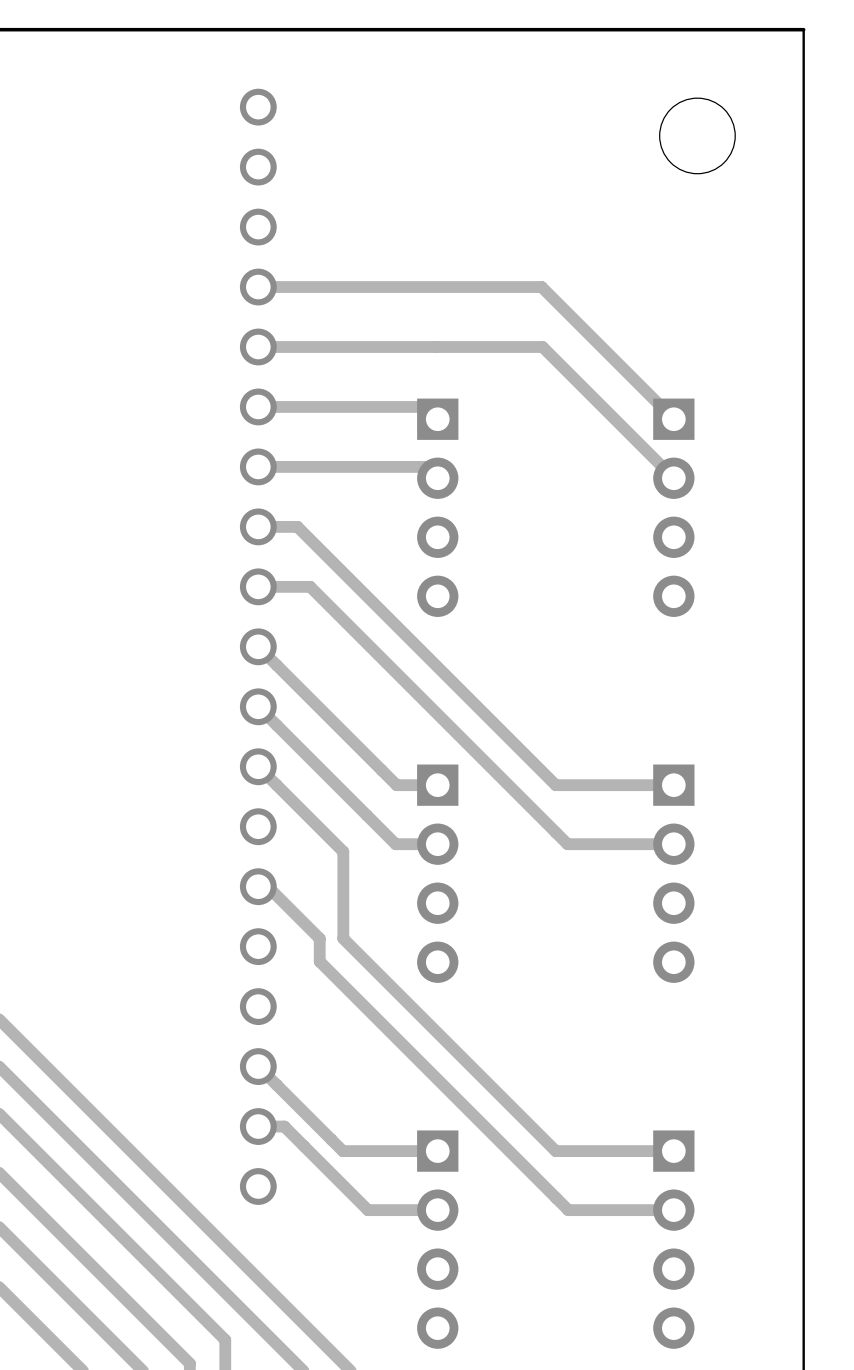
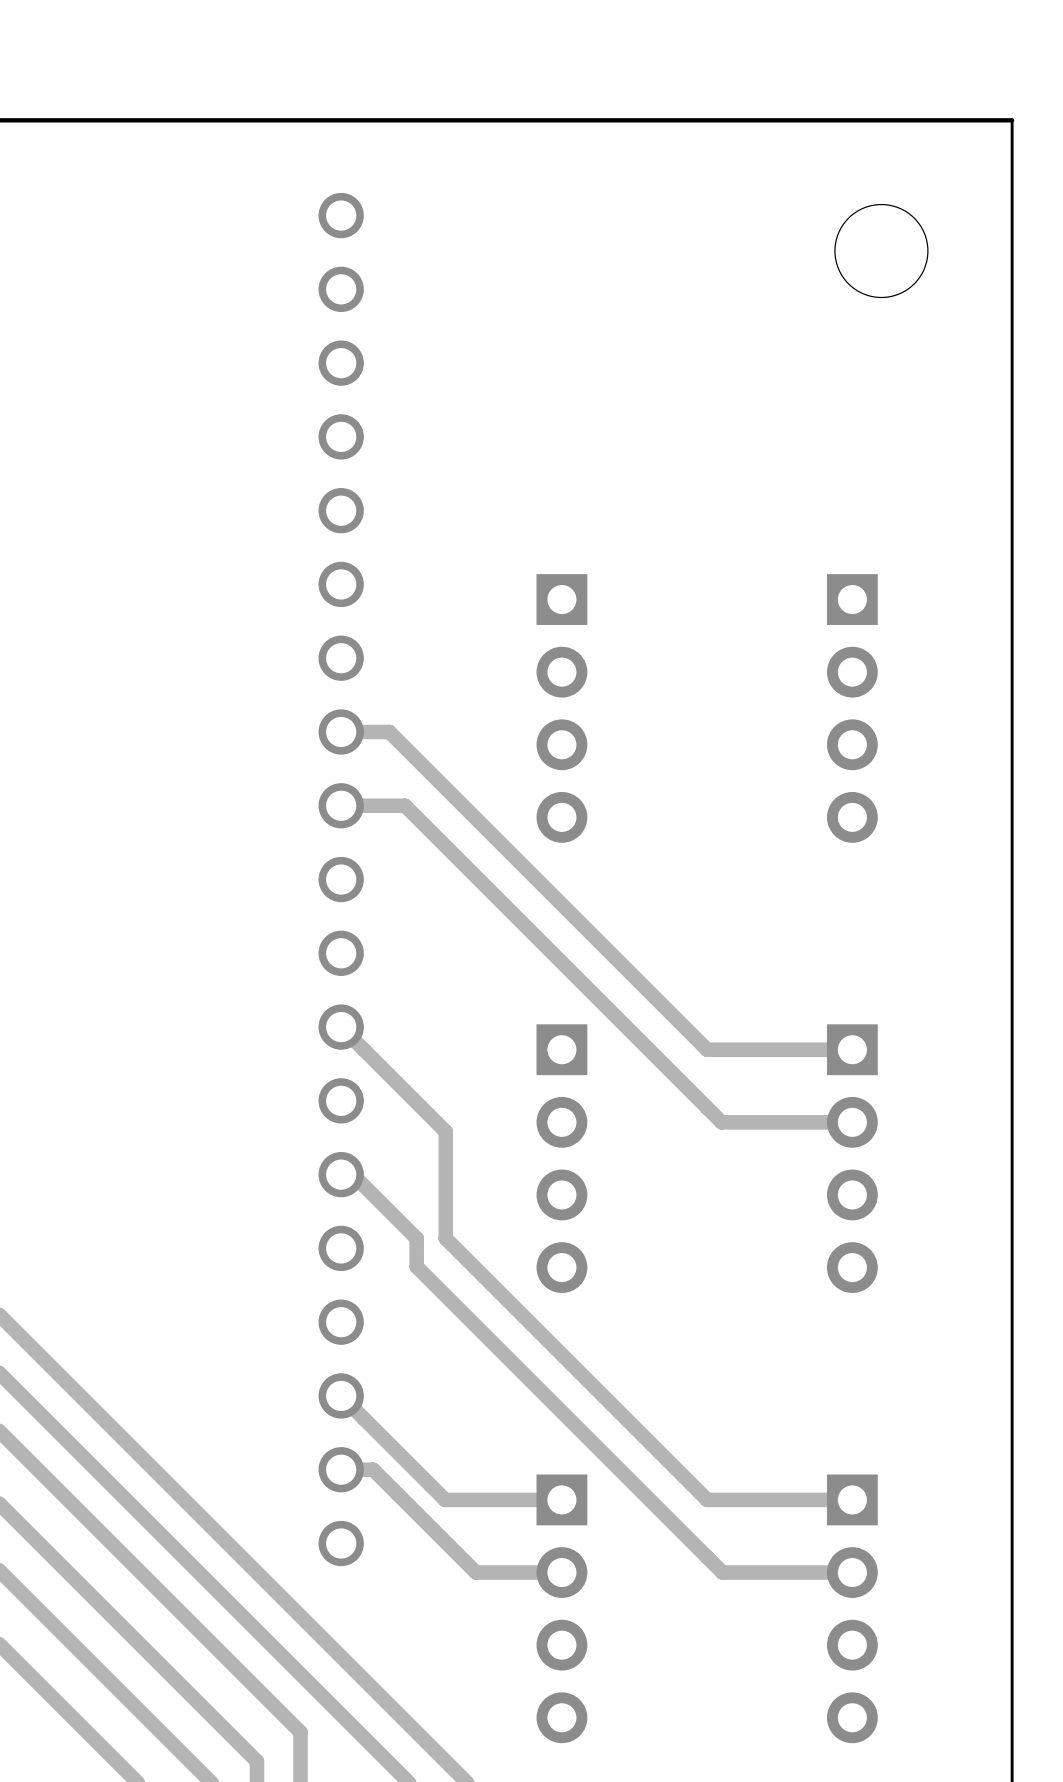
track: (258, 287) (541, 287) (673, 419) -> none
track: (258, 346) (542, 346) (673, 478) -> none
track: (258, 406) (425, 406) (437, 419) -> none
track: (258, 466) (426, 466) (437, 478) -> none
track: (258, 646) (396, 785) (437, 785) -> none
track: (258, 706) (395, 844) (437, 844) -> none

